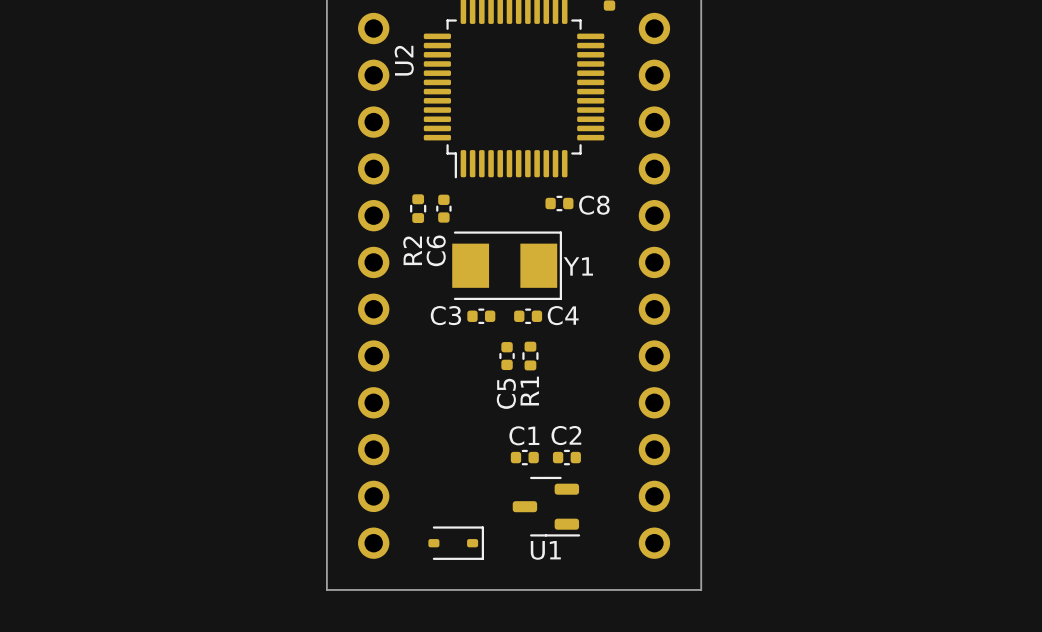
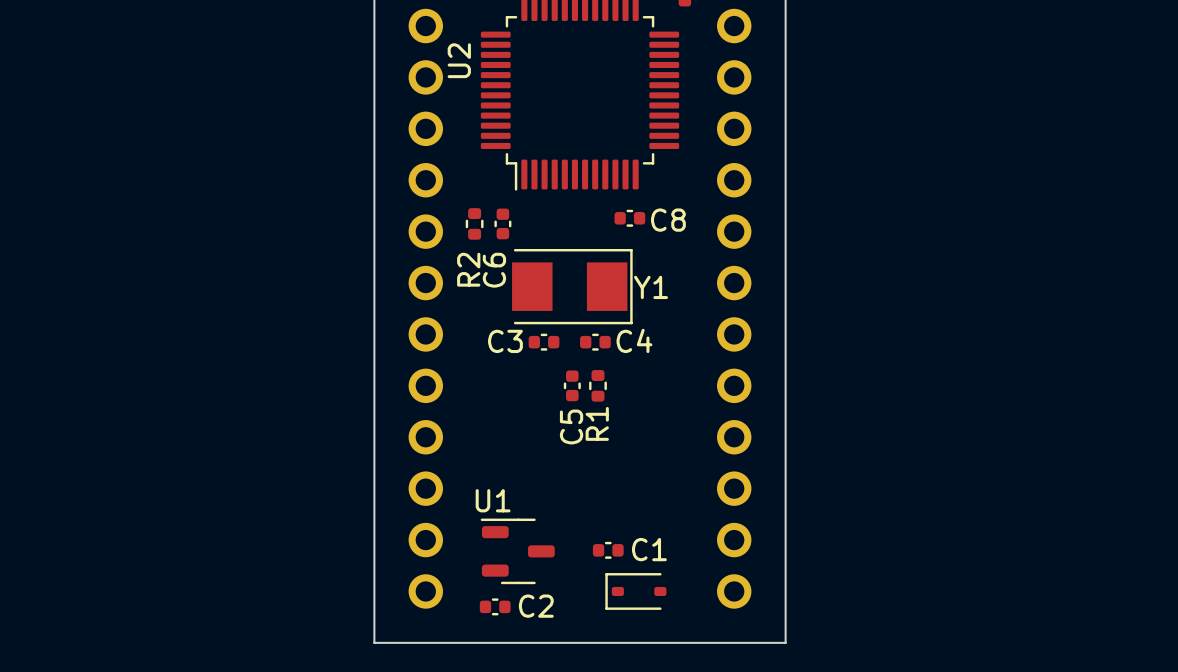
C1 name position: C1 (524, 435) -> C1 (649, 549)
C2 name position: C2 (566, 435) -> C2 (536, 606)
C1 position: (524, 457) -> (608, 550)
C2 position: (566, 457) -> (495, 606)
U1 rotation: 0° (546, 506) -> 180° (517, 551)
U1 position: (546, 506) -> (517, 551)
part rotation: 0° (456, 543) -> 180° (635, 591)
part position: (456, 543) -> (635, 591)

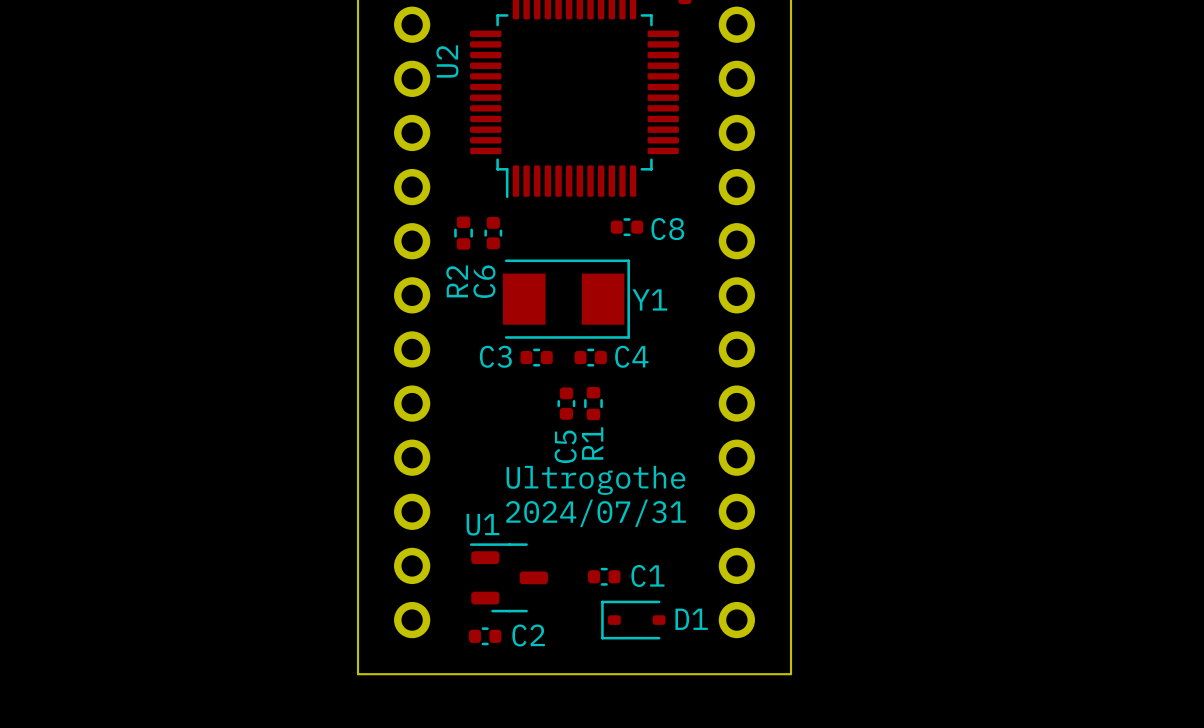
text: none -> Ultrogothe (595, 480)
text: none -> 2024/07/31 (596, 513)
D1 name: none -> D1 (691, 619)

